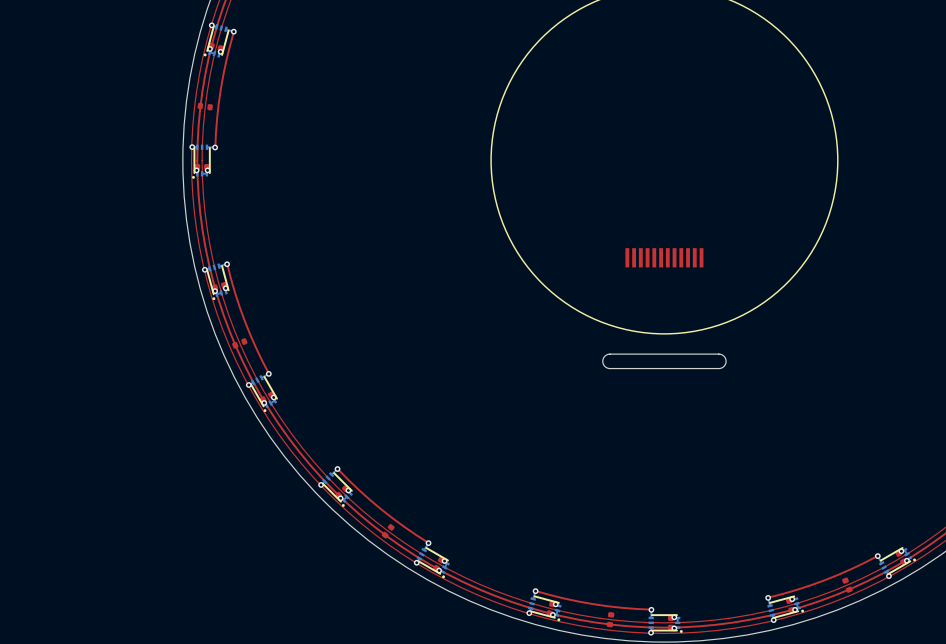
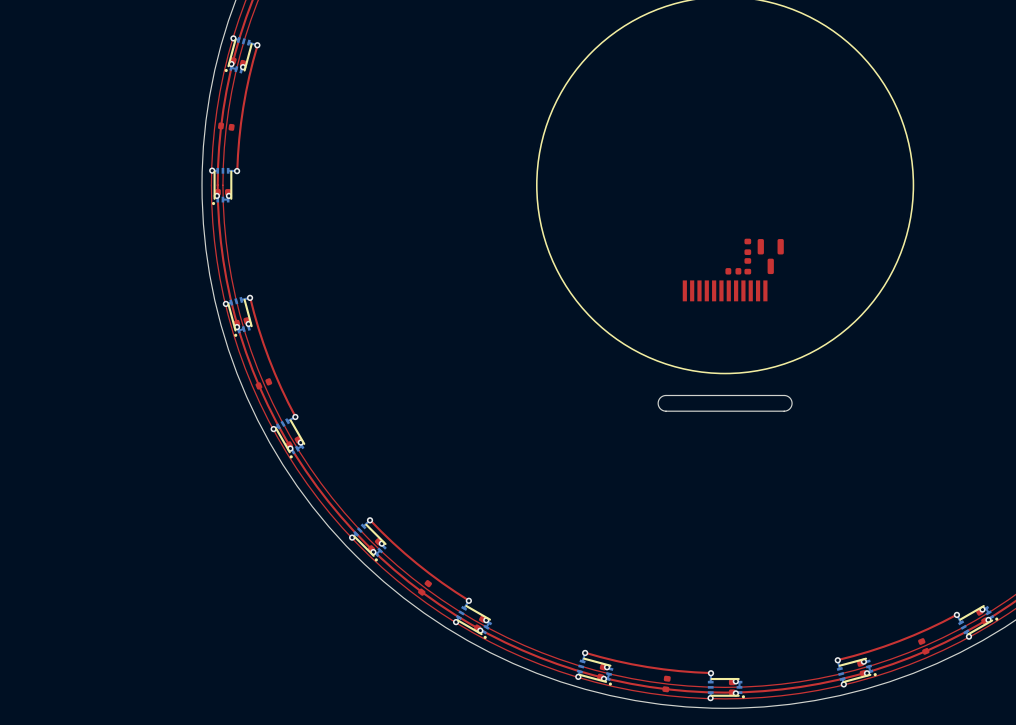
part: none -> (747, 246)
part: none -> (770, 256)
part: none -> (747, 266)
part: none -> (733, 271)

